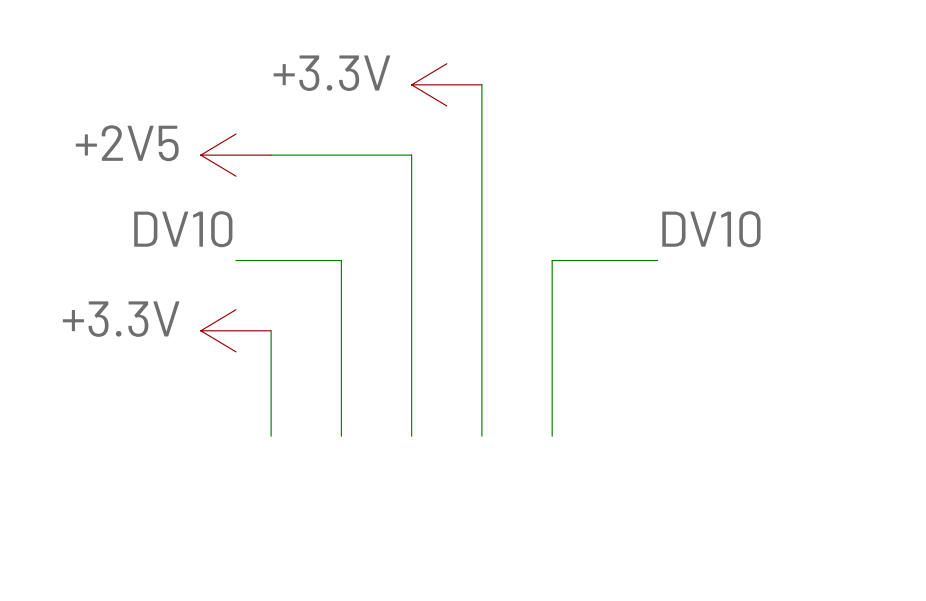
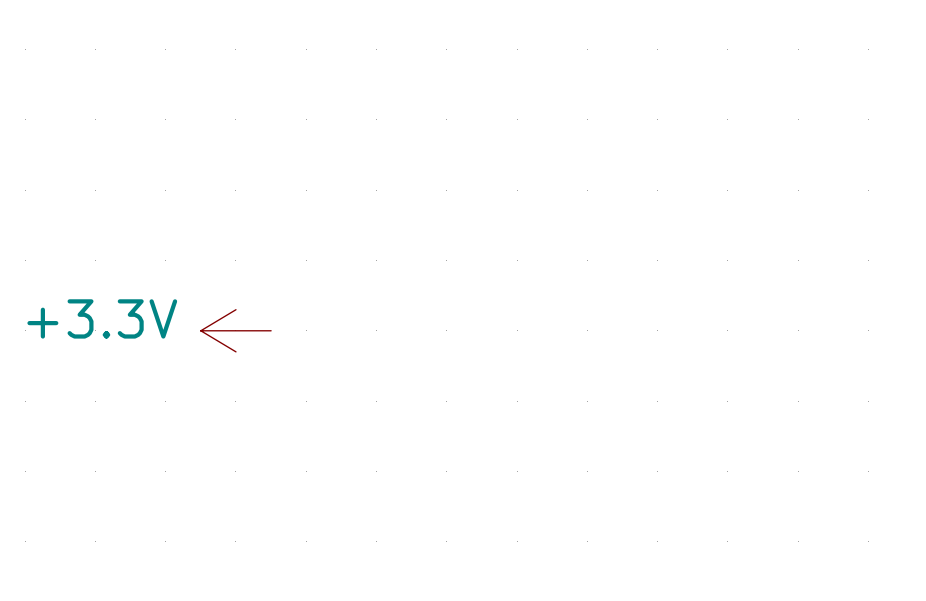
power symbol: +3.3V (446, 84) -> none
wire: (481, 84) (481, 436) -> none
power symbol: +2V5 (235, 155) -> none
wire: (271, 155) (411, 155) (411, 436) -> none
label: DV10 (183, 229) -> none
label: DV10 (711, 229) -> none
wire: (235, 260) (341, 260) (341, 436) -> none
wire: (657, 260) (552, 260) (552, 436) -> none
wire: (271, 330) (271, 436) -> none

